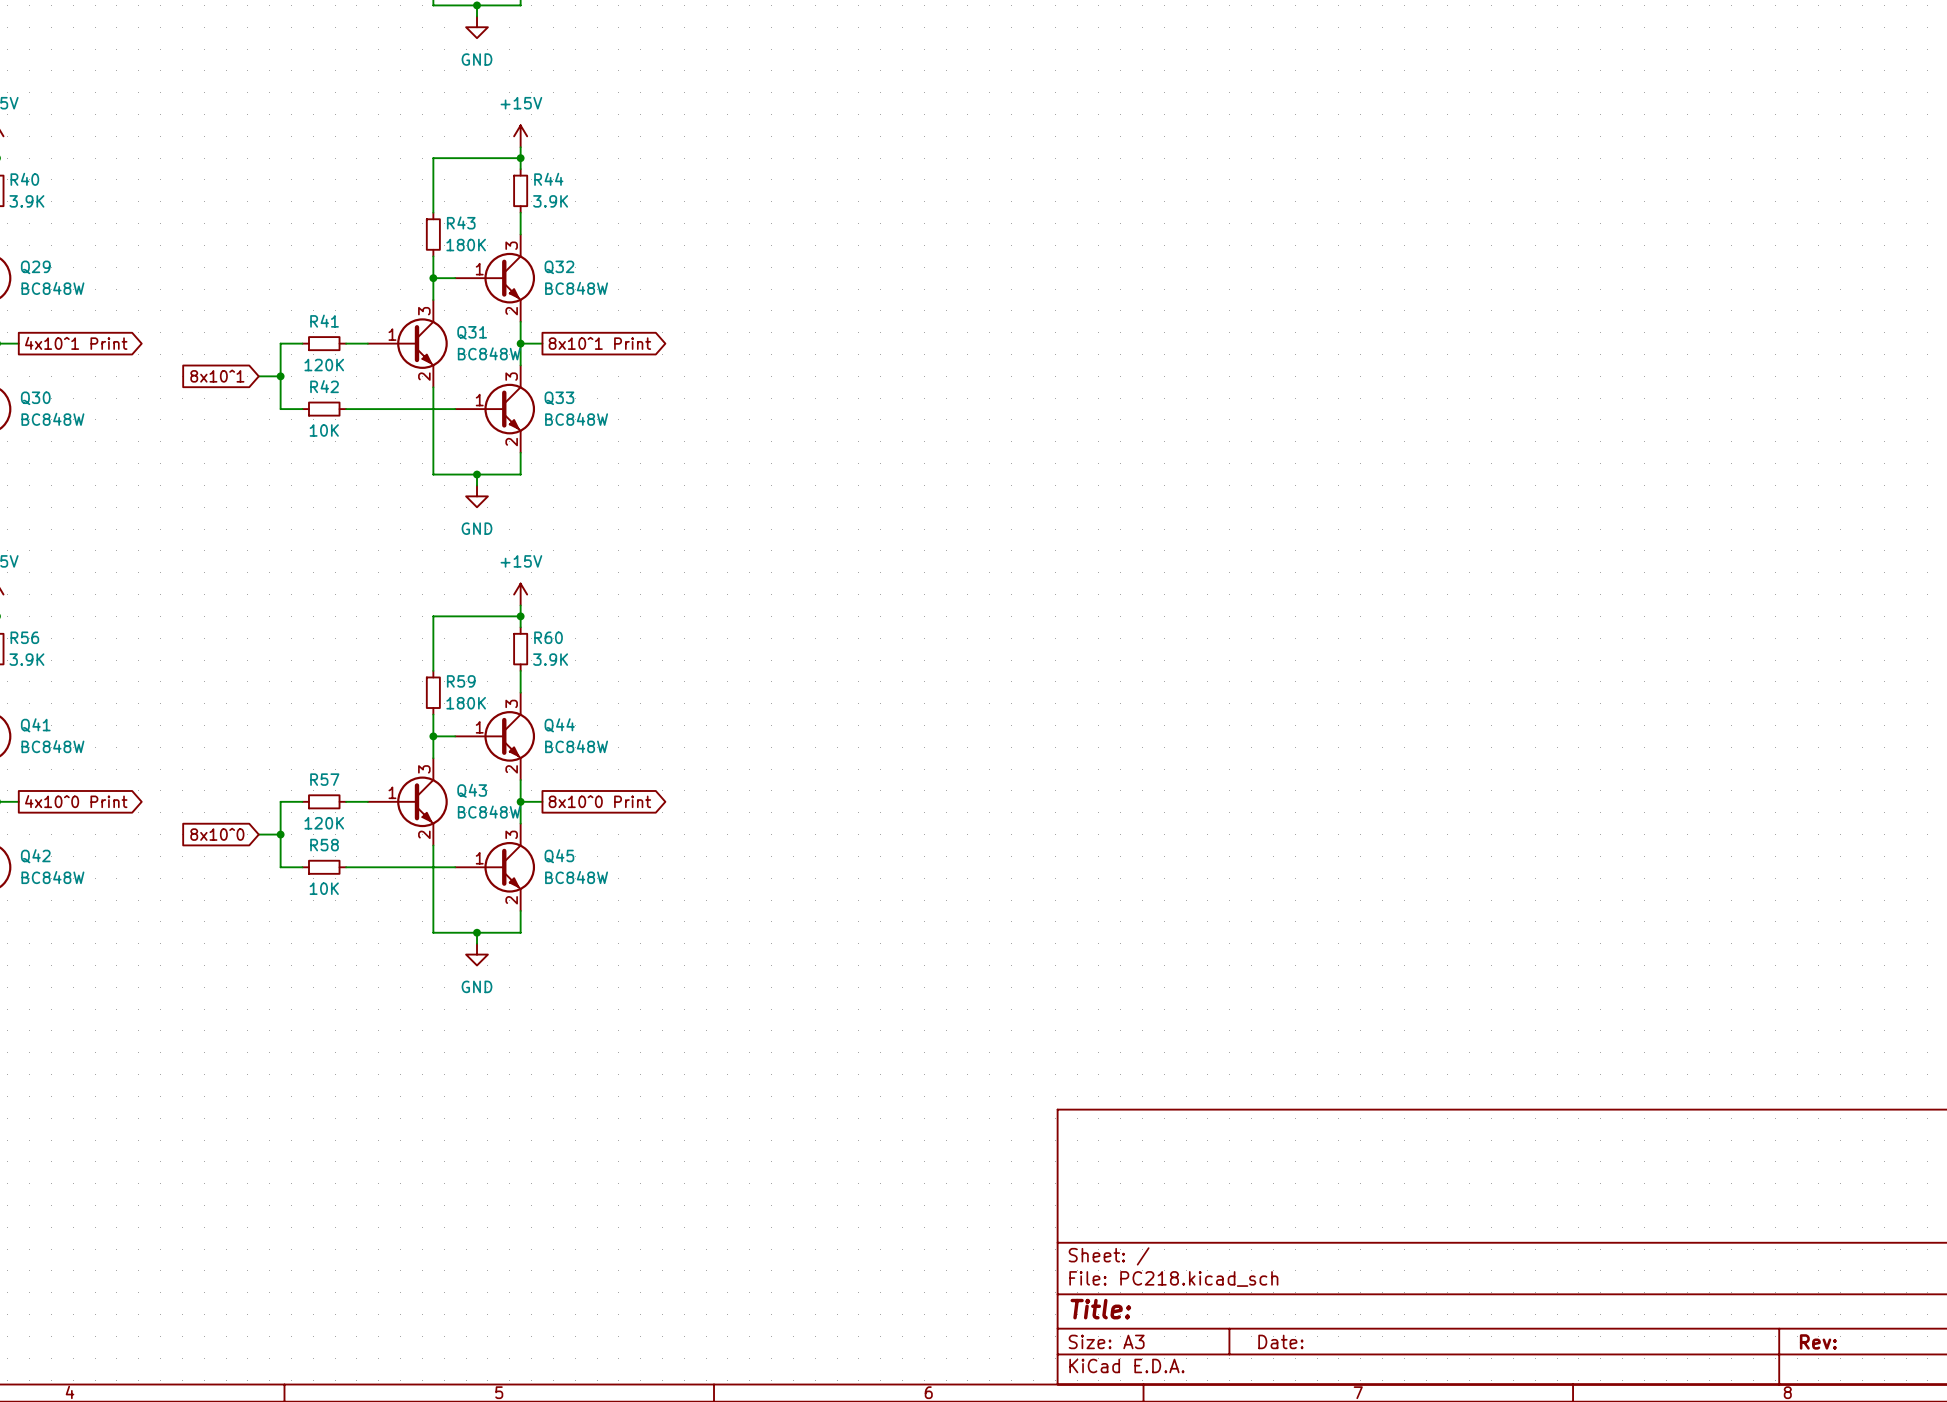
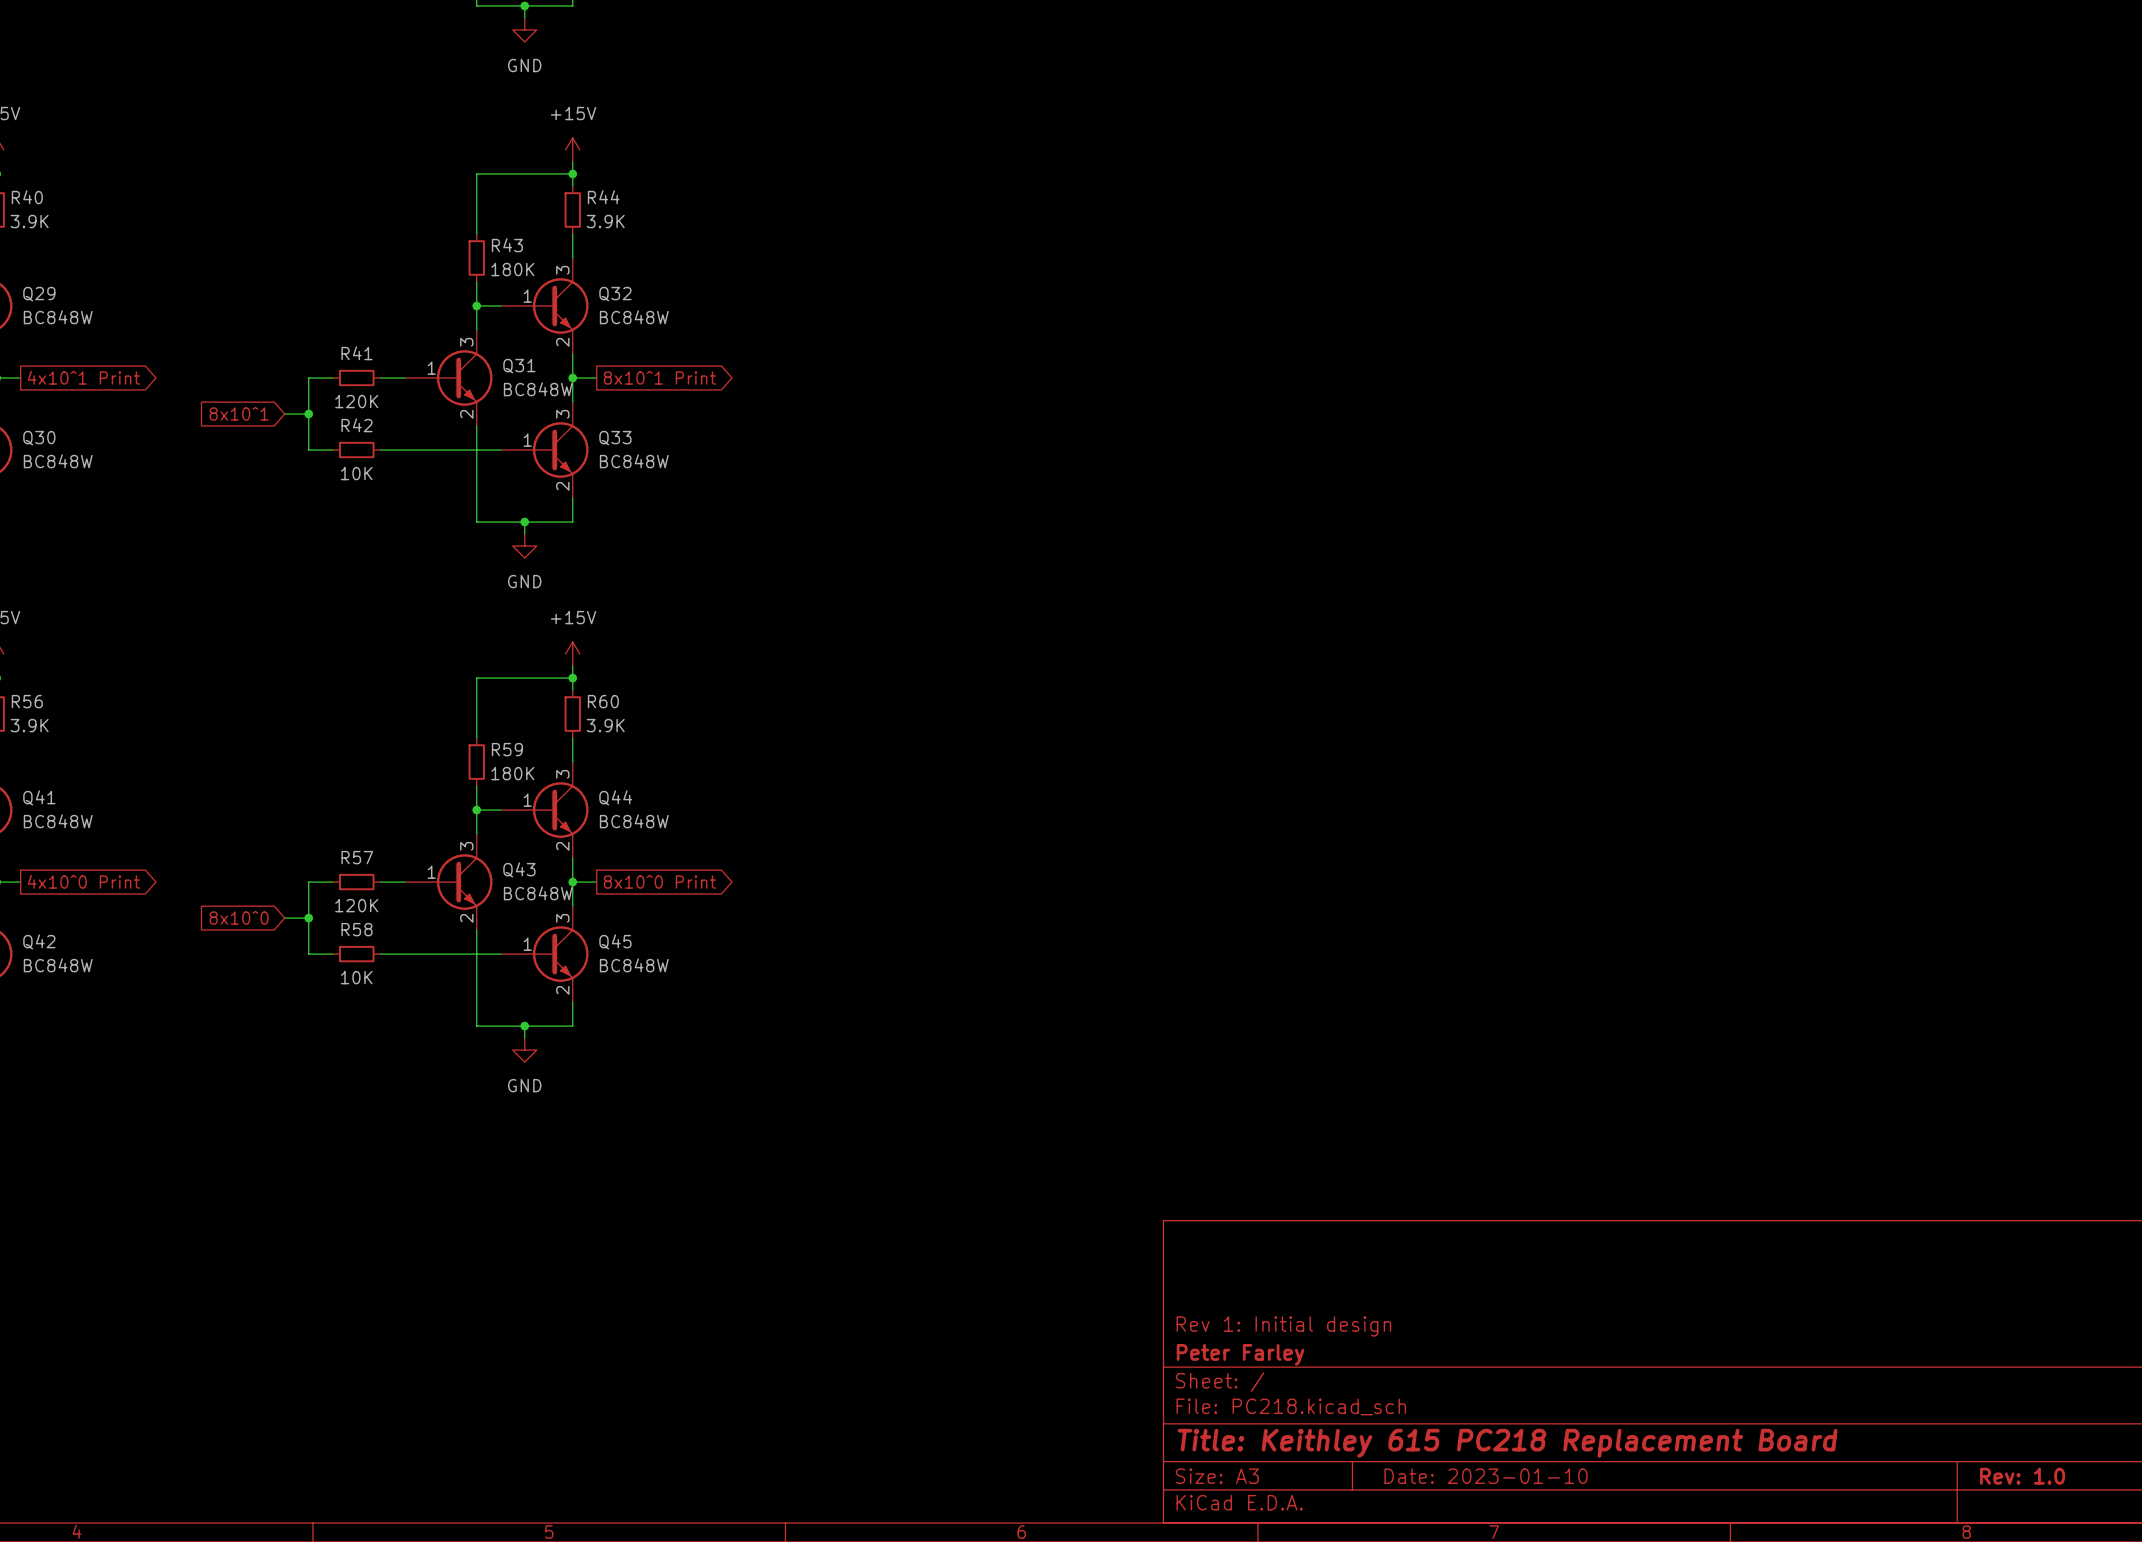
title block: none -> Rev 1: Initial design (1283, 1326)
title block: none -> Peter Farley (1240, 1354)
title block: Title: (1100, 1309) -> Title: Keithley 615 PC218 Replacement Board (1507, 1443)
title block: Date: (1280, 1341) -> Date: 2023-01-10 (1486, 1476)
title block: Rev: (1818, 1341) -> Rev: 1.0 (2022, 1476)

